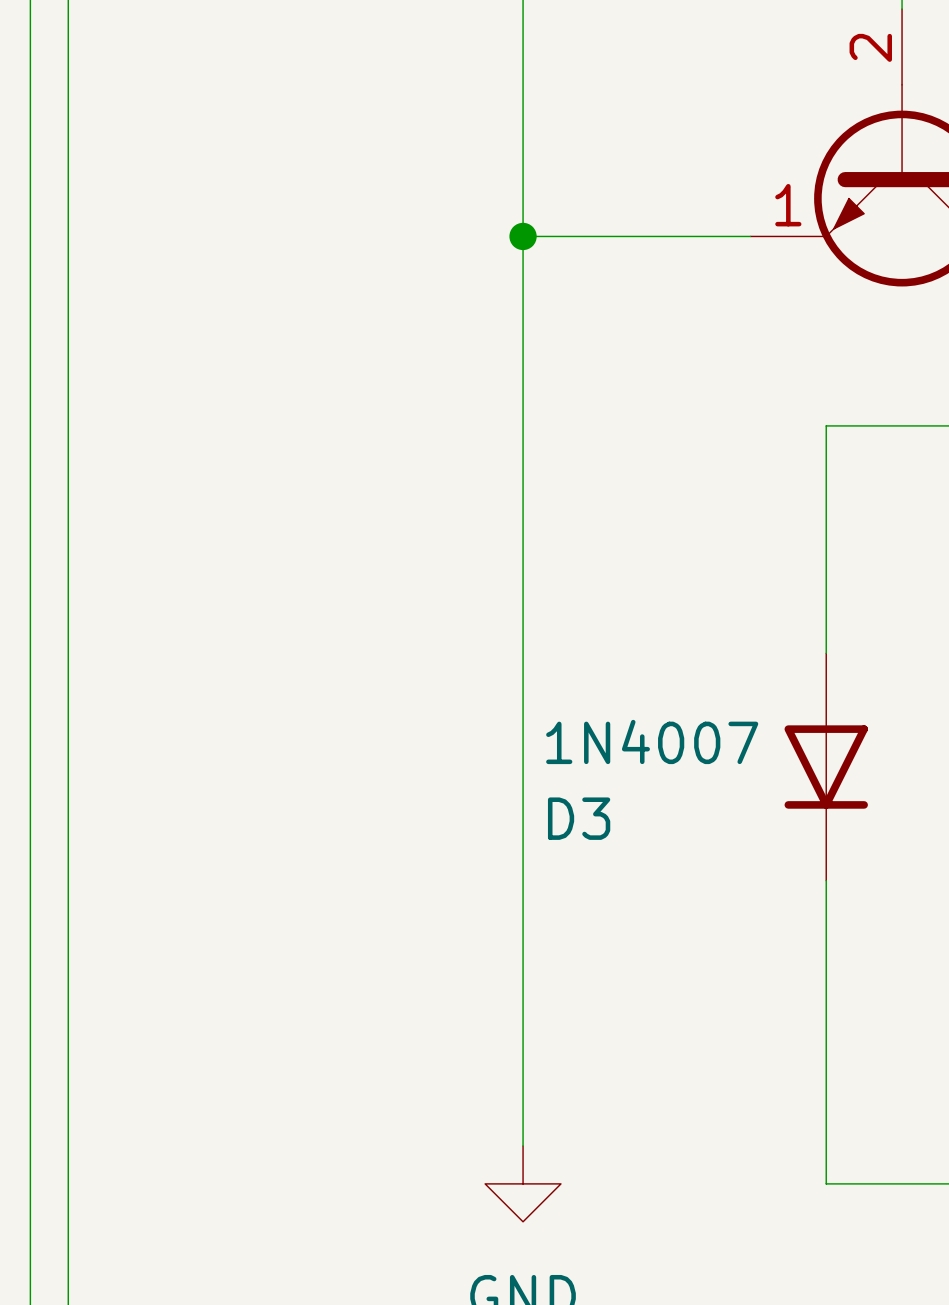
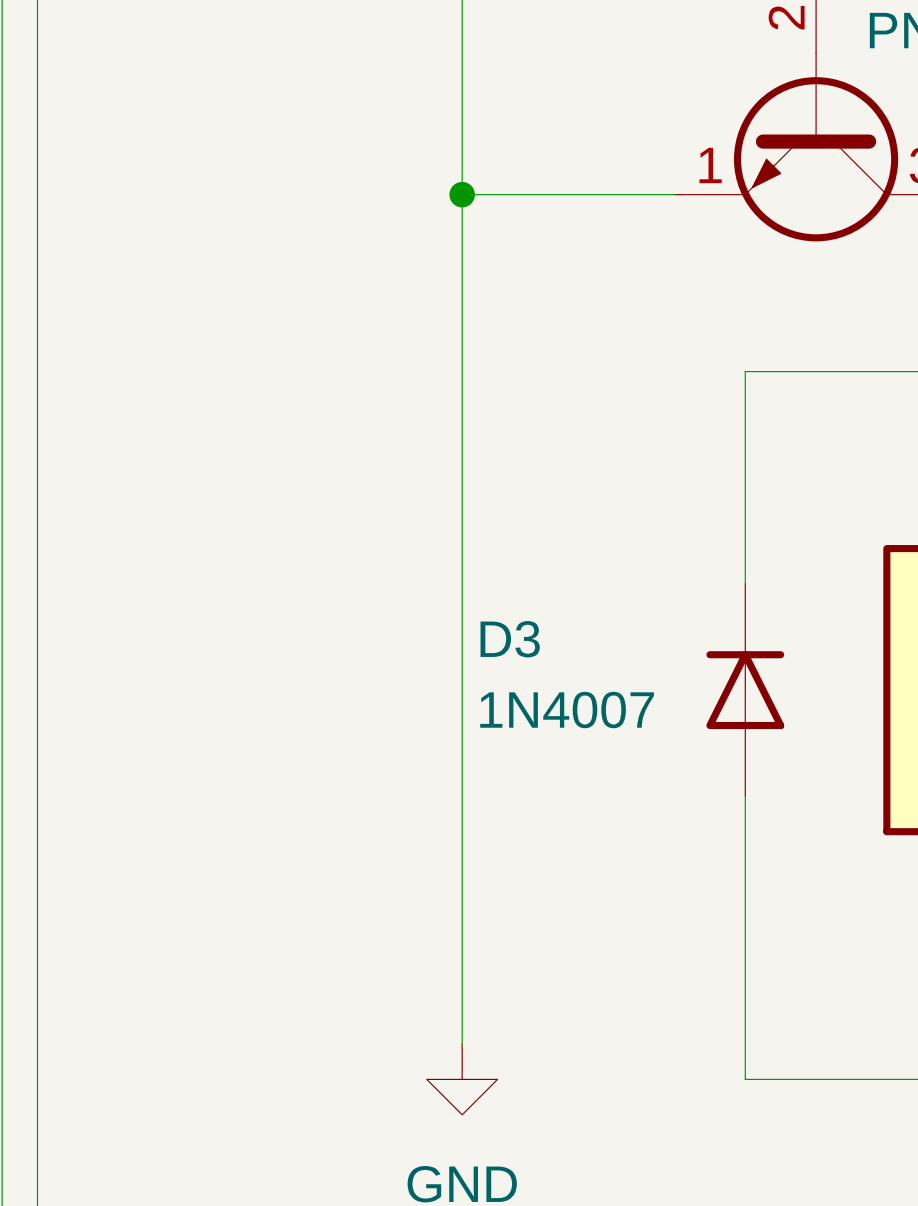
D3 rotation: 0° (826, 767) -> 180° (745, 690)
D3 name position: D3 (579, 818) -> D3 (510, 639)

